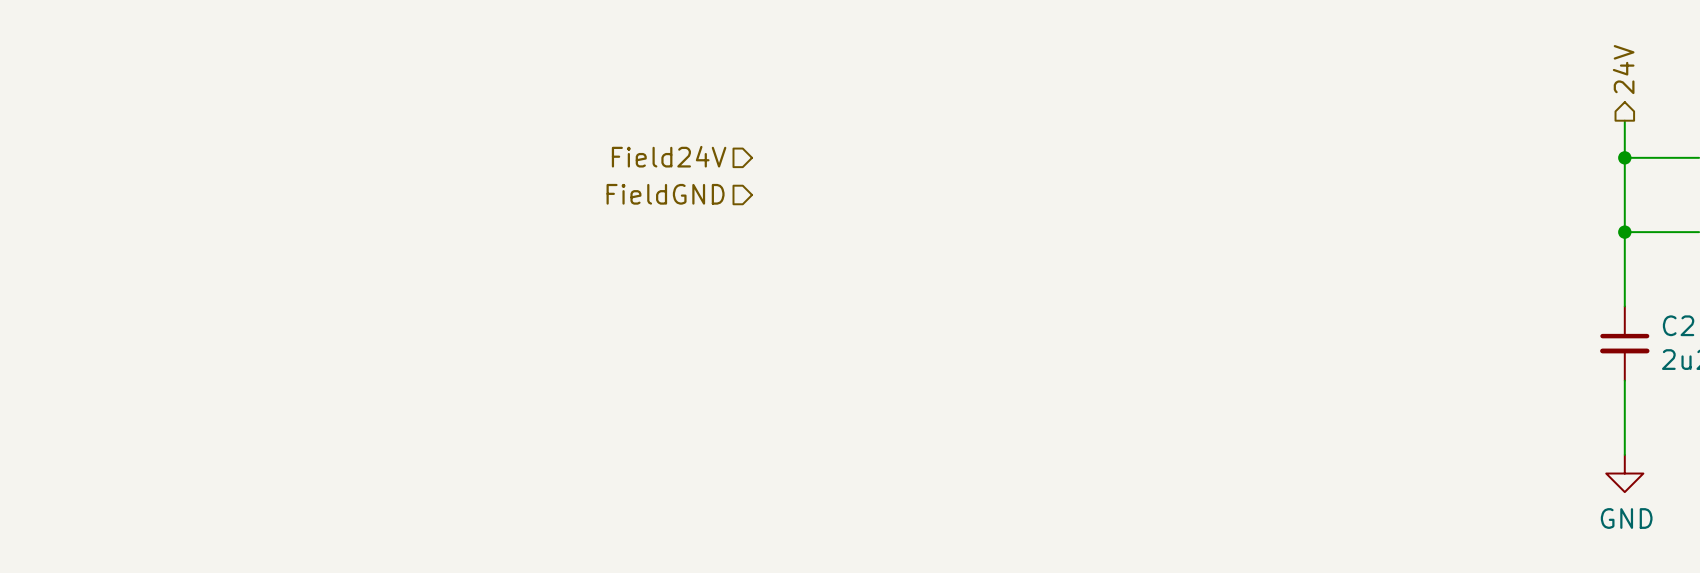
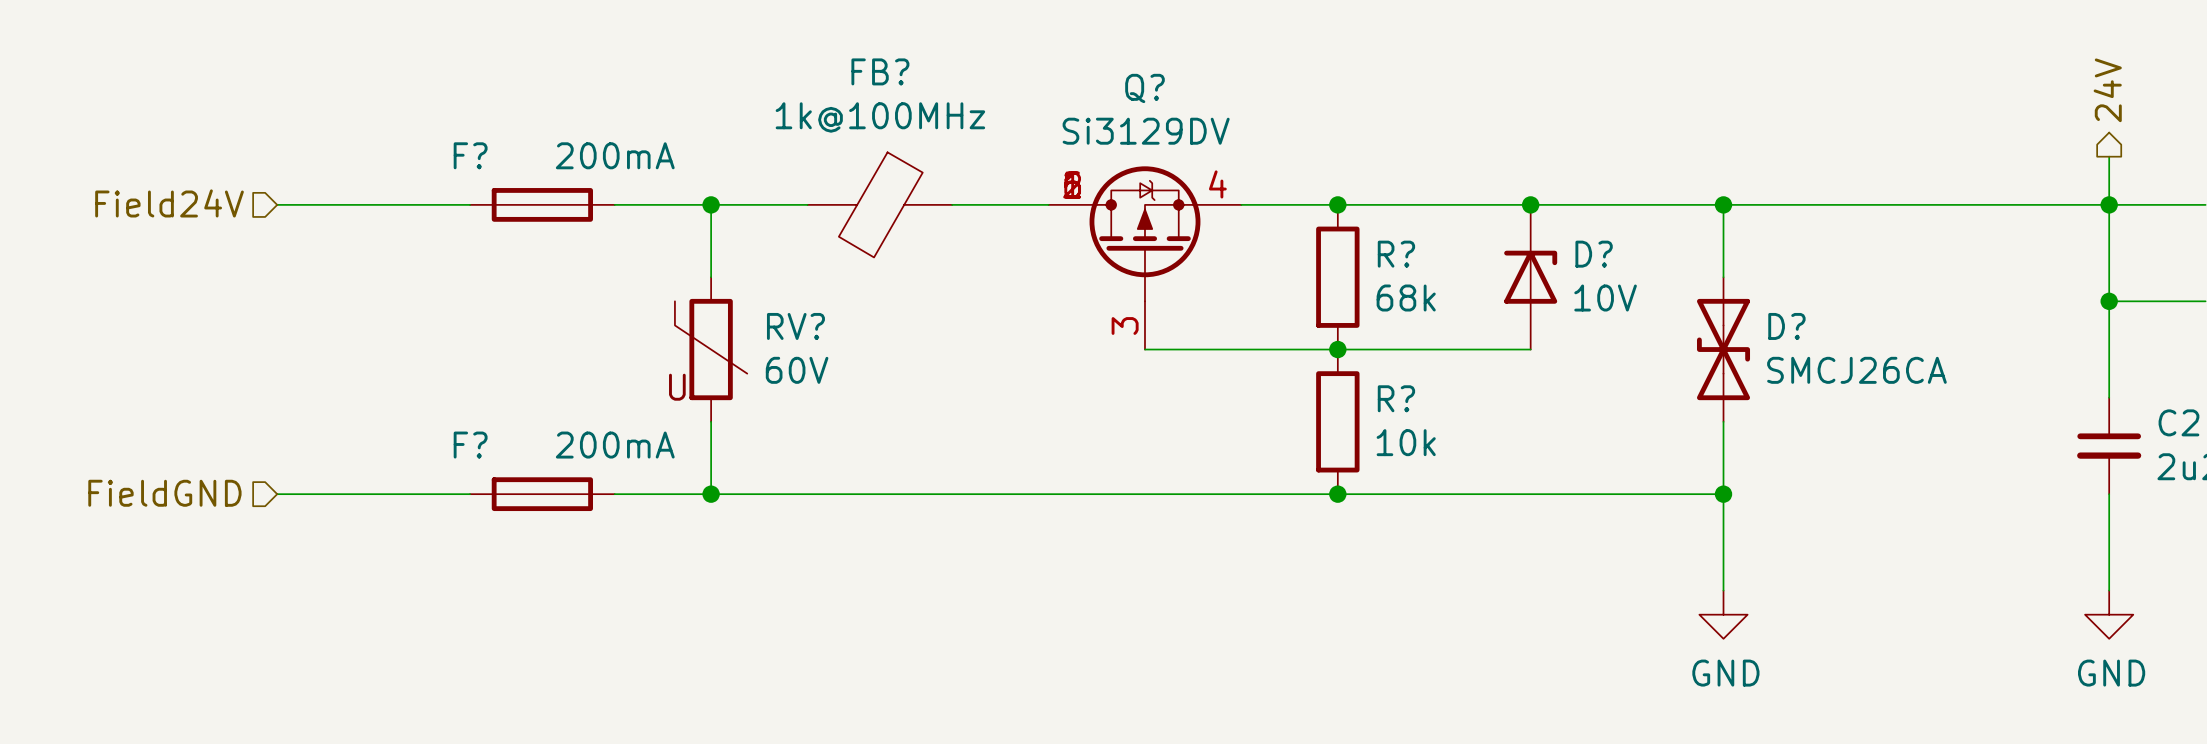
hierarchical label: none -> Field24V (169, 203)
hierarchical label: Field24V (669, 156) -> none
wire: none -> (277, 204) (470, 204)
F?: none -> 200mA (542, 204)
wire: none -> (614, 204) (807, 204)
wire: none -> (711, 204) (711, 277)
junction: none -> (711, 204)
FB?: none -> 1k@100MHz (879, 204)
wire: none -> (952, 204) (1048, 204)
wire: none -> (1241, 204) (2109, 204)
junction: none -> (1337, 204)
junction: none -> (1530, 204)
wire: none -> (1723, 204) (1723, 277)
junction: none -> (1723, 204)
hierarchical label: FieldGND (665, 194) -> none
Q?: none -> Si3129DV (1144, 257)
R?: none -> 68k (1337, 277)
D?: none -> 10V (1530, 277)
RV?: none -> 60V (711, 349)
wire: none -> (1144, 349) (1530, 349)
junction: none -> (1337, 349)
D?: none -> SMCJ26CA (1723, 349)
wire: none -> (711, 421) (711, 494)
R?: none -> 10k (1337, 421)
wire: none -> (1723, 421) (1723, 590)
hierarchical label: none -> FieldGND (164, 493)
wire: none -> (277, 494) (470, 494)
F?: none -> 200mA (542, 494)
wire: none -> (614, 494) (1723, 494)
junction: none -> (711, 494)
junction: none -> (1337, 494)
junction: none -> (1723, 494)
power symbol: none -> GND (1723, 614)

